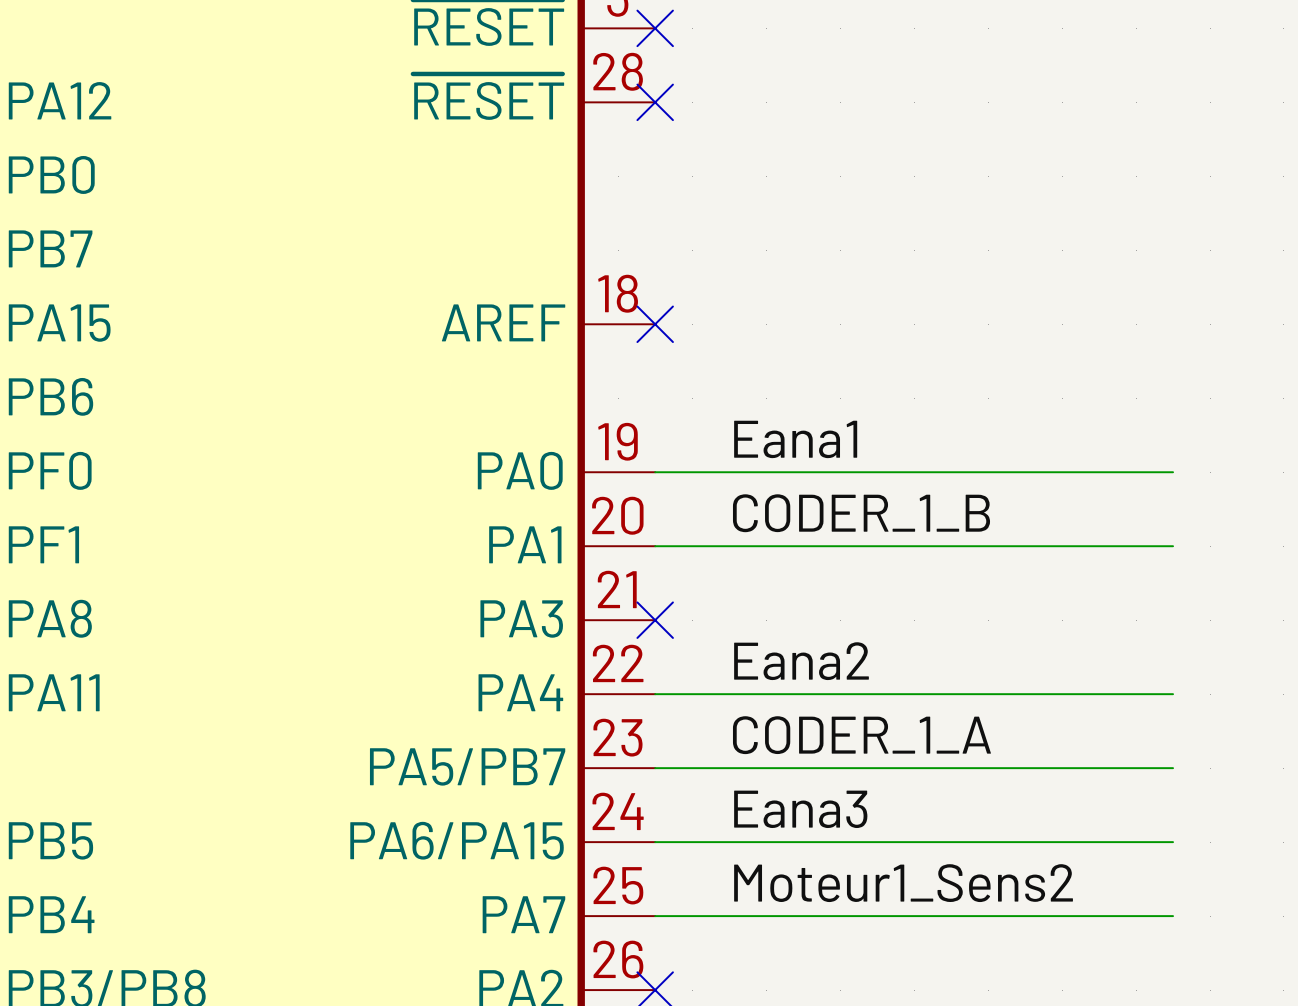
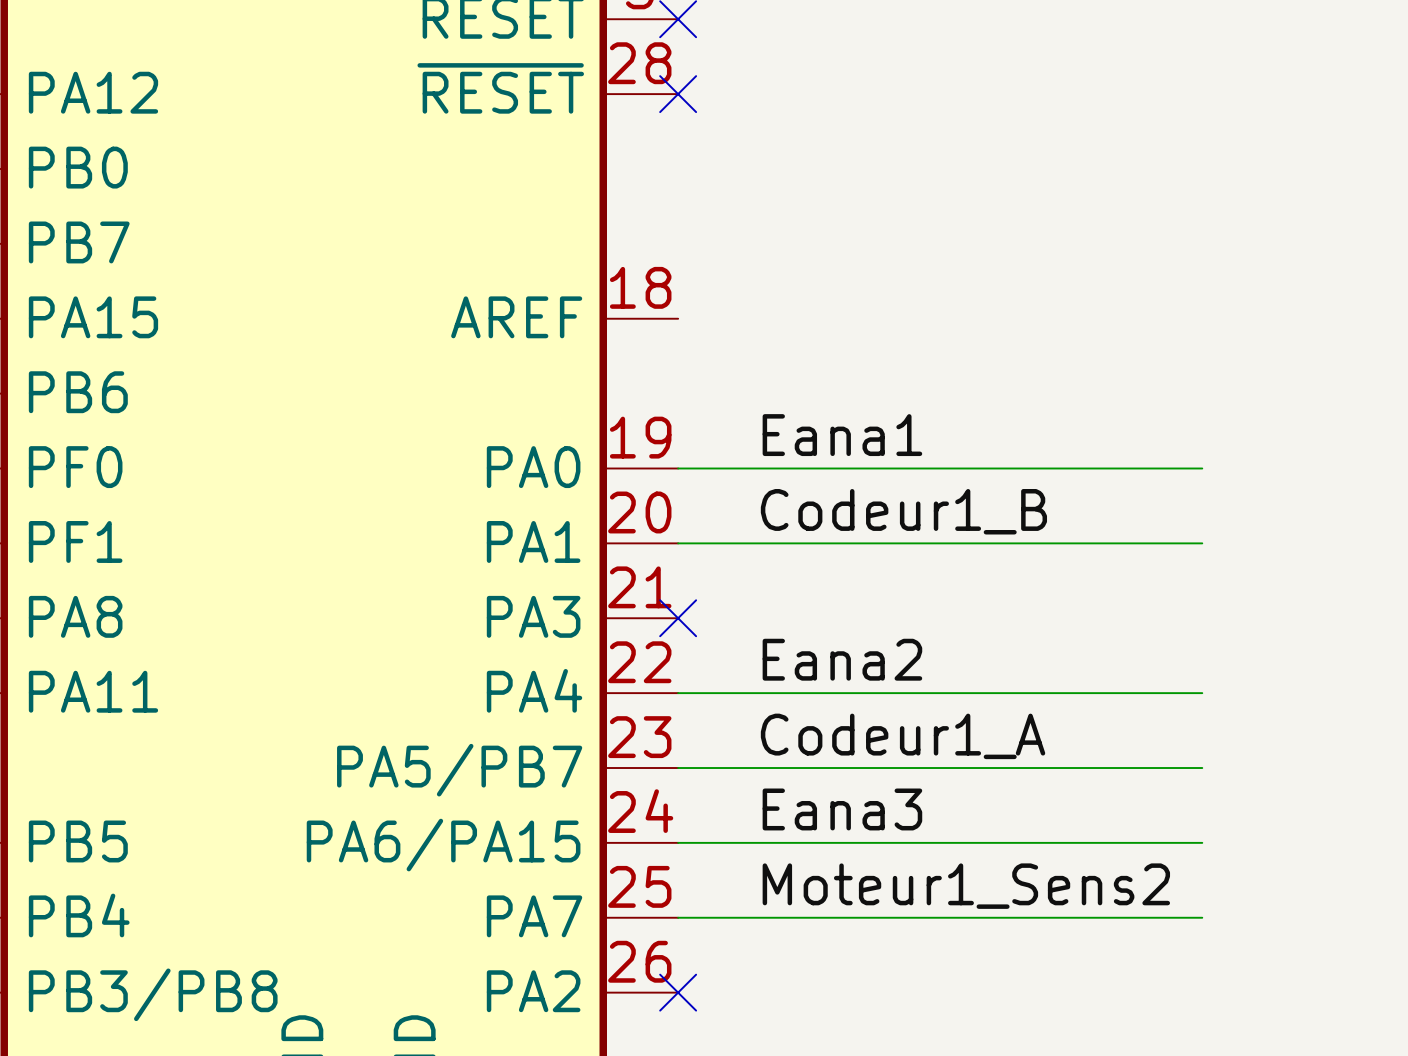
no-connect mark: (655, 324) -> none
label: CODER_1_B (861, 513) -> Codeur1_B (903, 511)
label: CODER_1_A (861, 735) -> Codeur1_A (903, 736)

